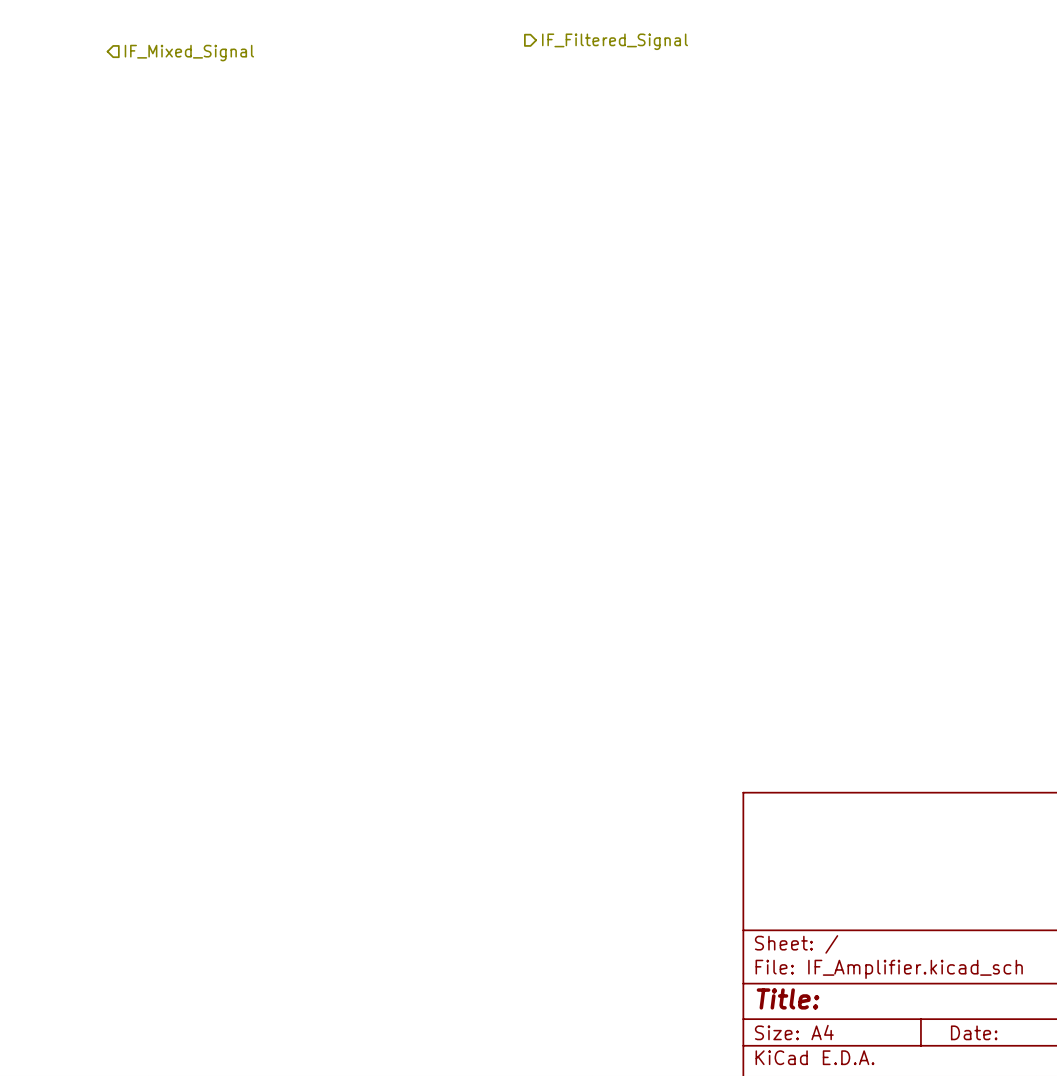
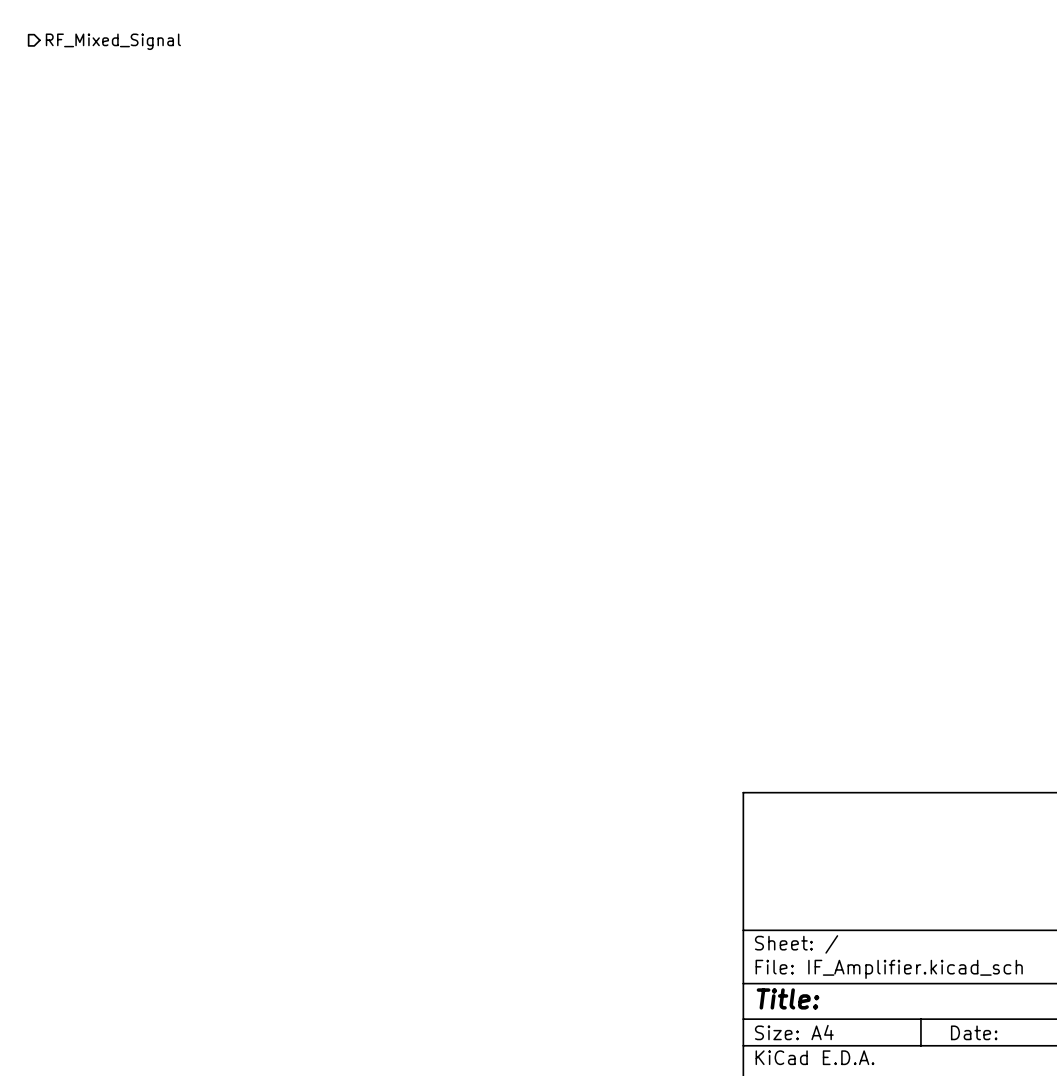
hierarchical label: IF_Filtered_Signal (615, 41) -> none
hierarchical label shape: input (189, 53) -> output (113, 41)
hierarchical label: IF_Mixed_Signal (189, 53) -> RF_Mixed_Signal (113, 41)

